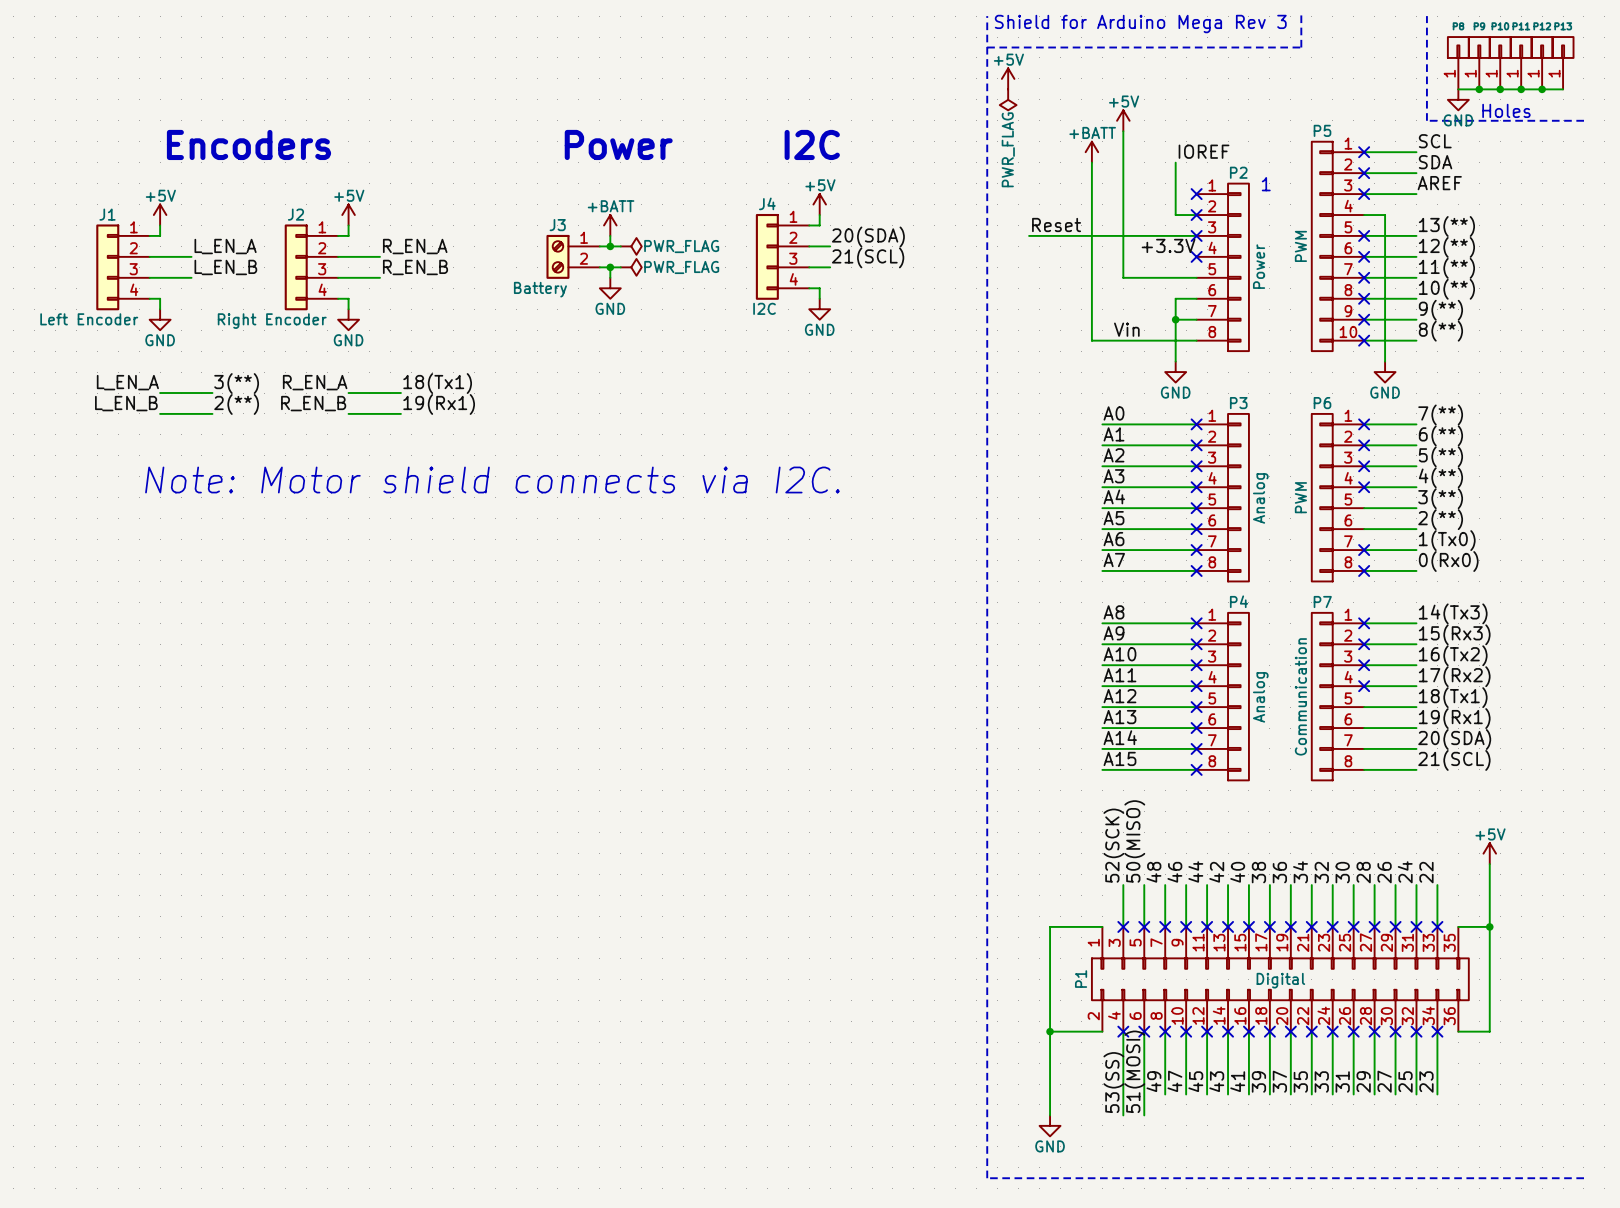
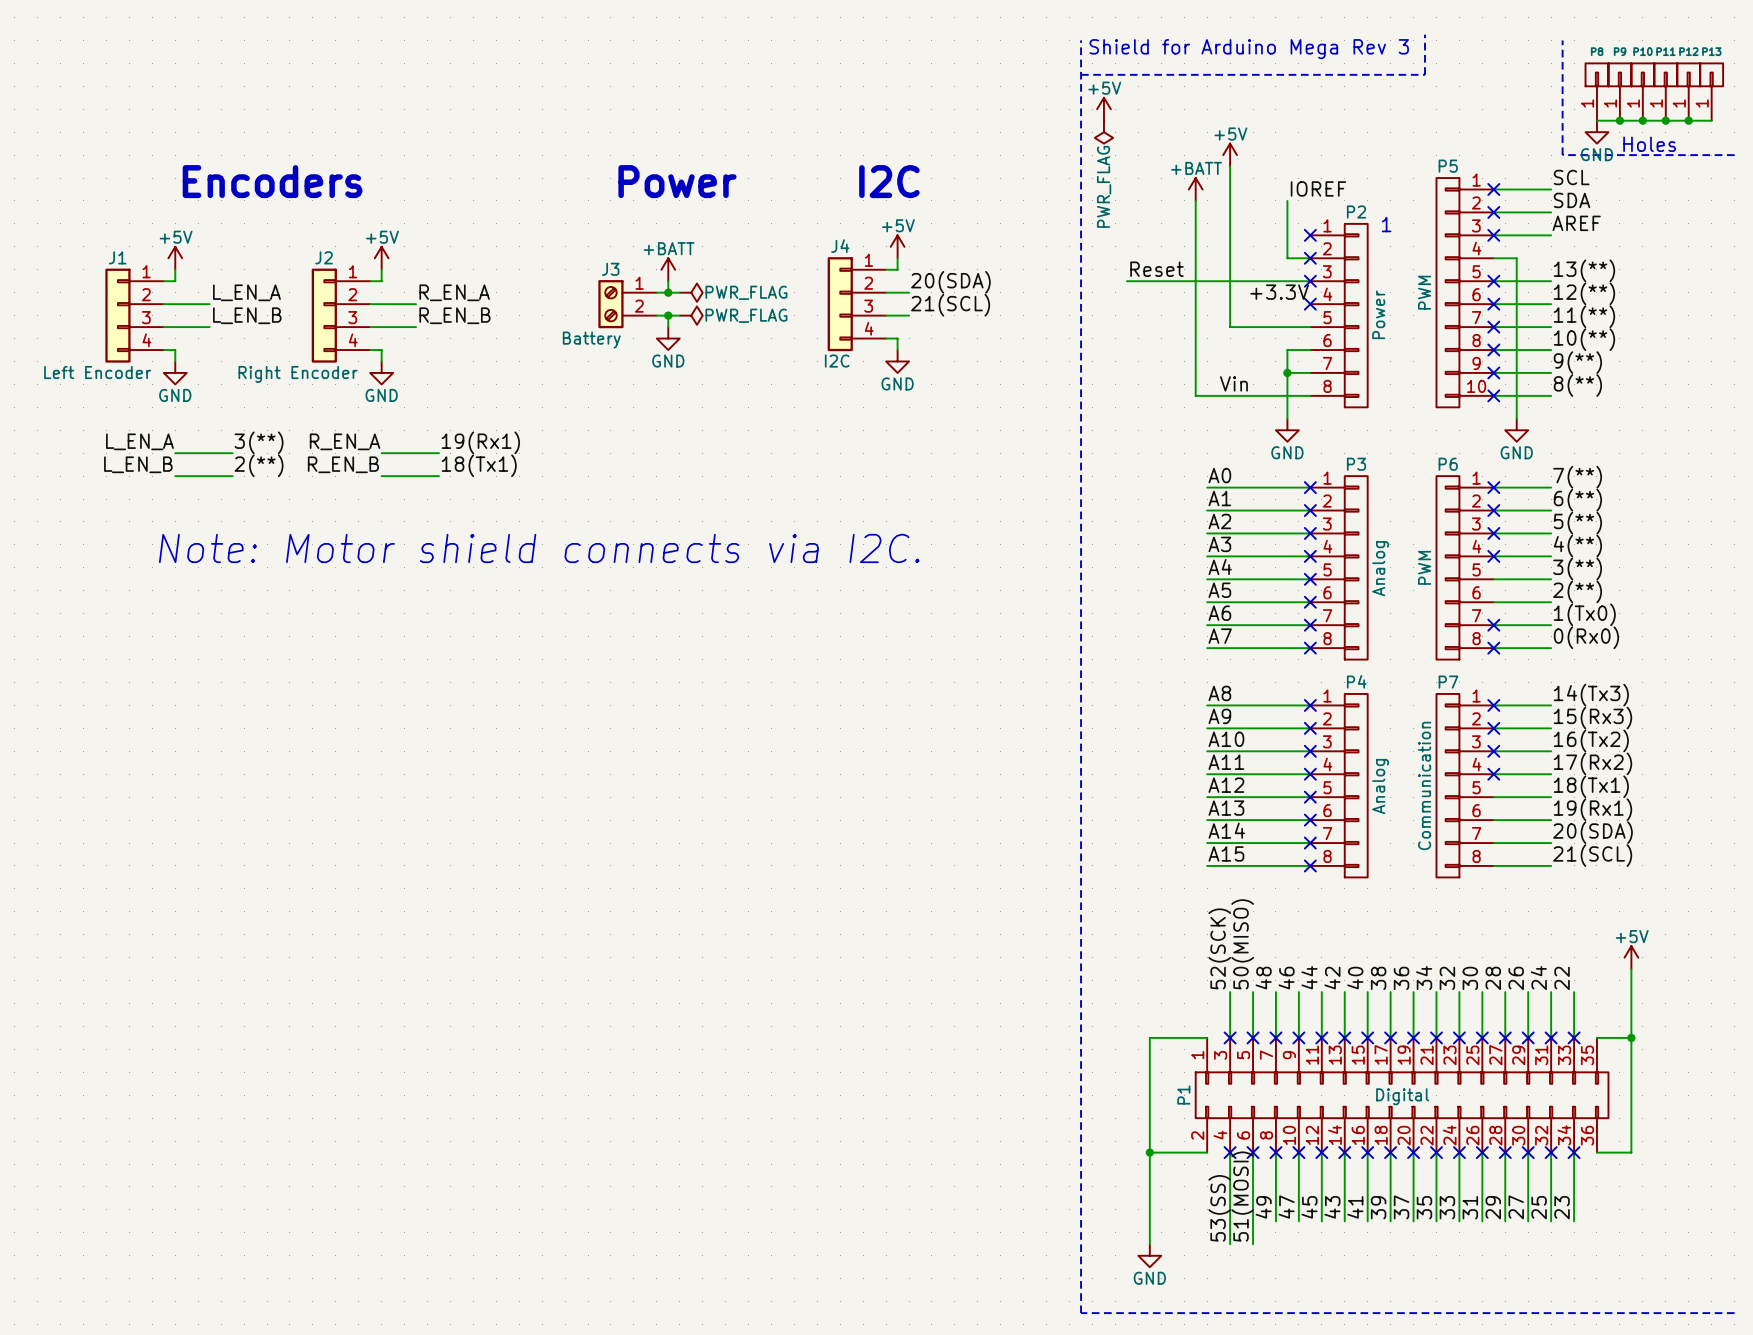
label: 18(Tx1) (437, 383) -> 19(Rx1) (480, 442)
label: 19(Rx1) (439, 404) -> 18(Tx1) (479, 465)

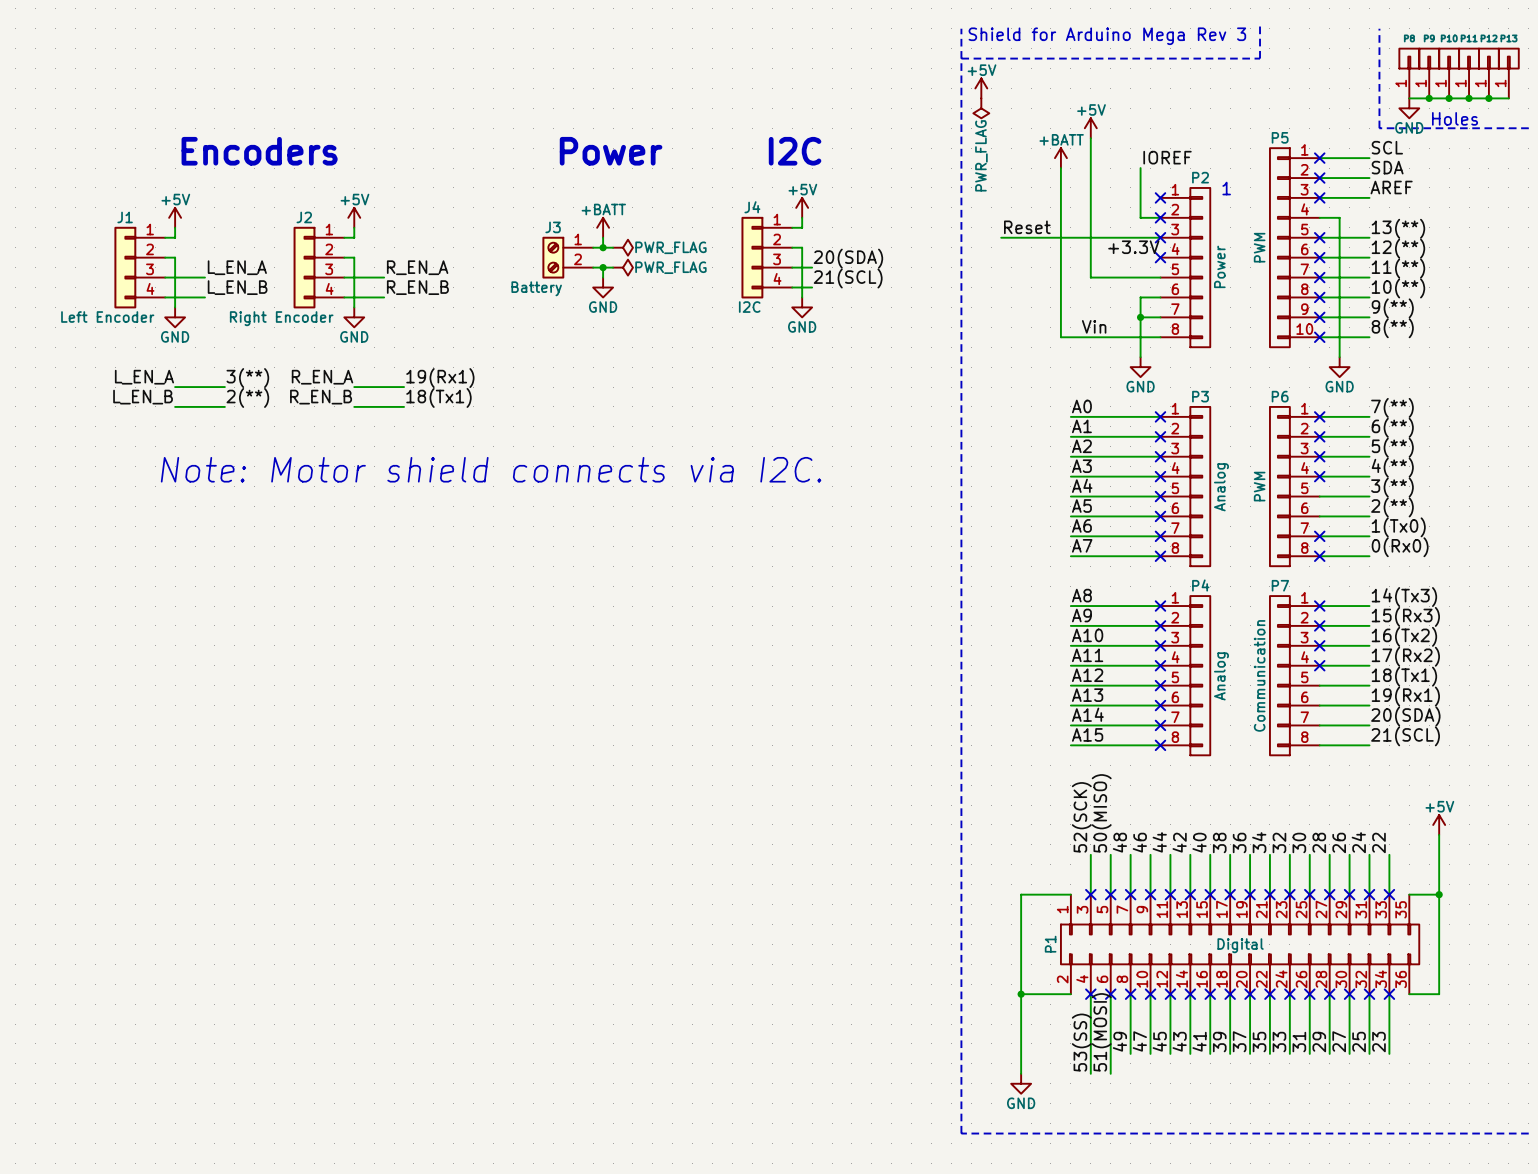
label: 20(SDA) (950, 282) -> none
label: L_EN_A (246, 292) -> none
label: R_EN_A (454, 292) -> none
wire: (897, 292) (909, 292) -> (802, 247) (802, 287) (812, 287)
wire: (175, 304) (209, 304) -> (175, 257) (175, 297) (204, 297)
wire: (381, 304) (416, 304) -> (354, 257) (354, 297) (384, 297)
label: 21(SCL) (950, 305) -> 20(SDA) (848, 258)
label: L_EN_B (247, 315) -> L_EN_A (237, 267)
label: R_EN_B (454, 315) -> R_EN_A (417, 267)
label: none -> 21(SCL) (848, 278)
label: none -> L_EN_B (237, 287)
label: none -> R_EN_B (417, 287)

